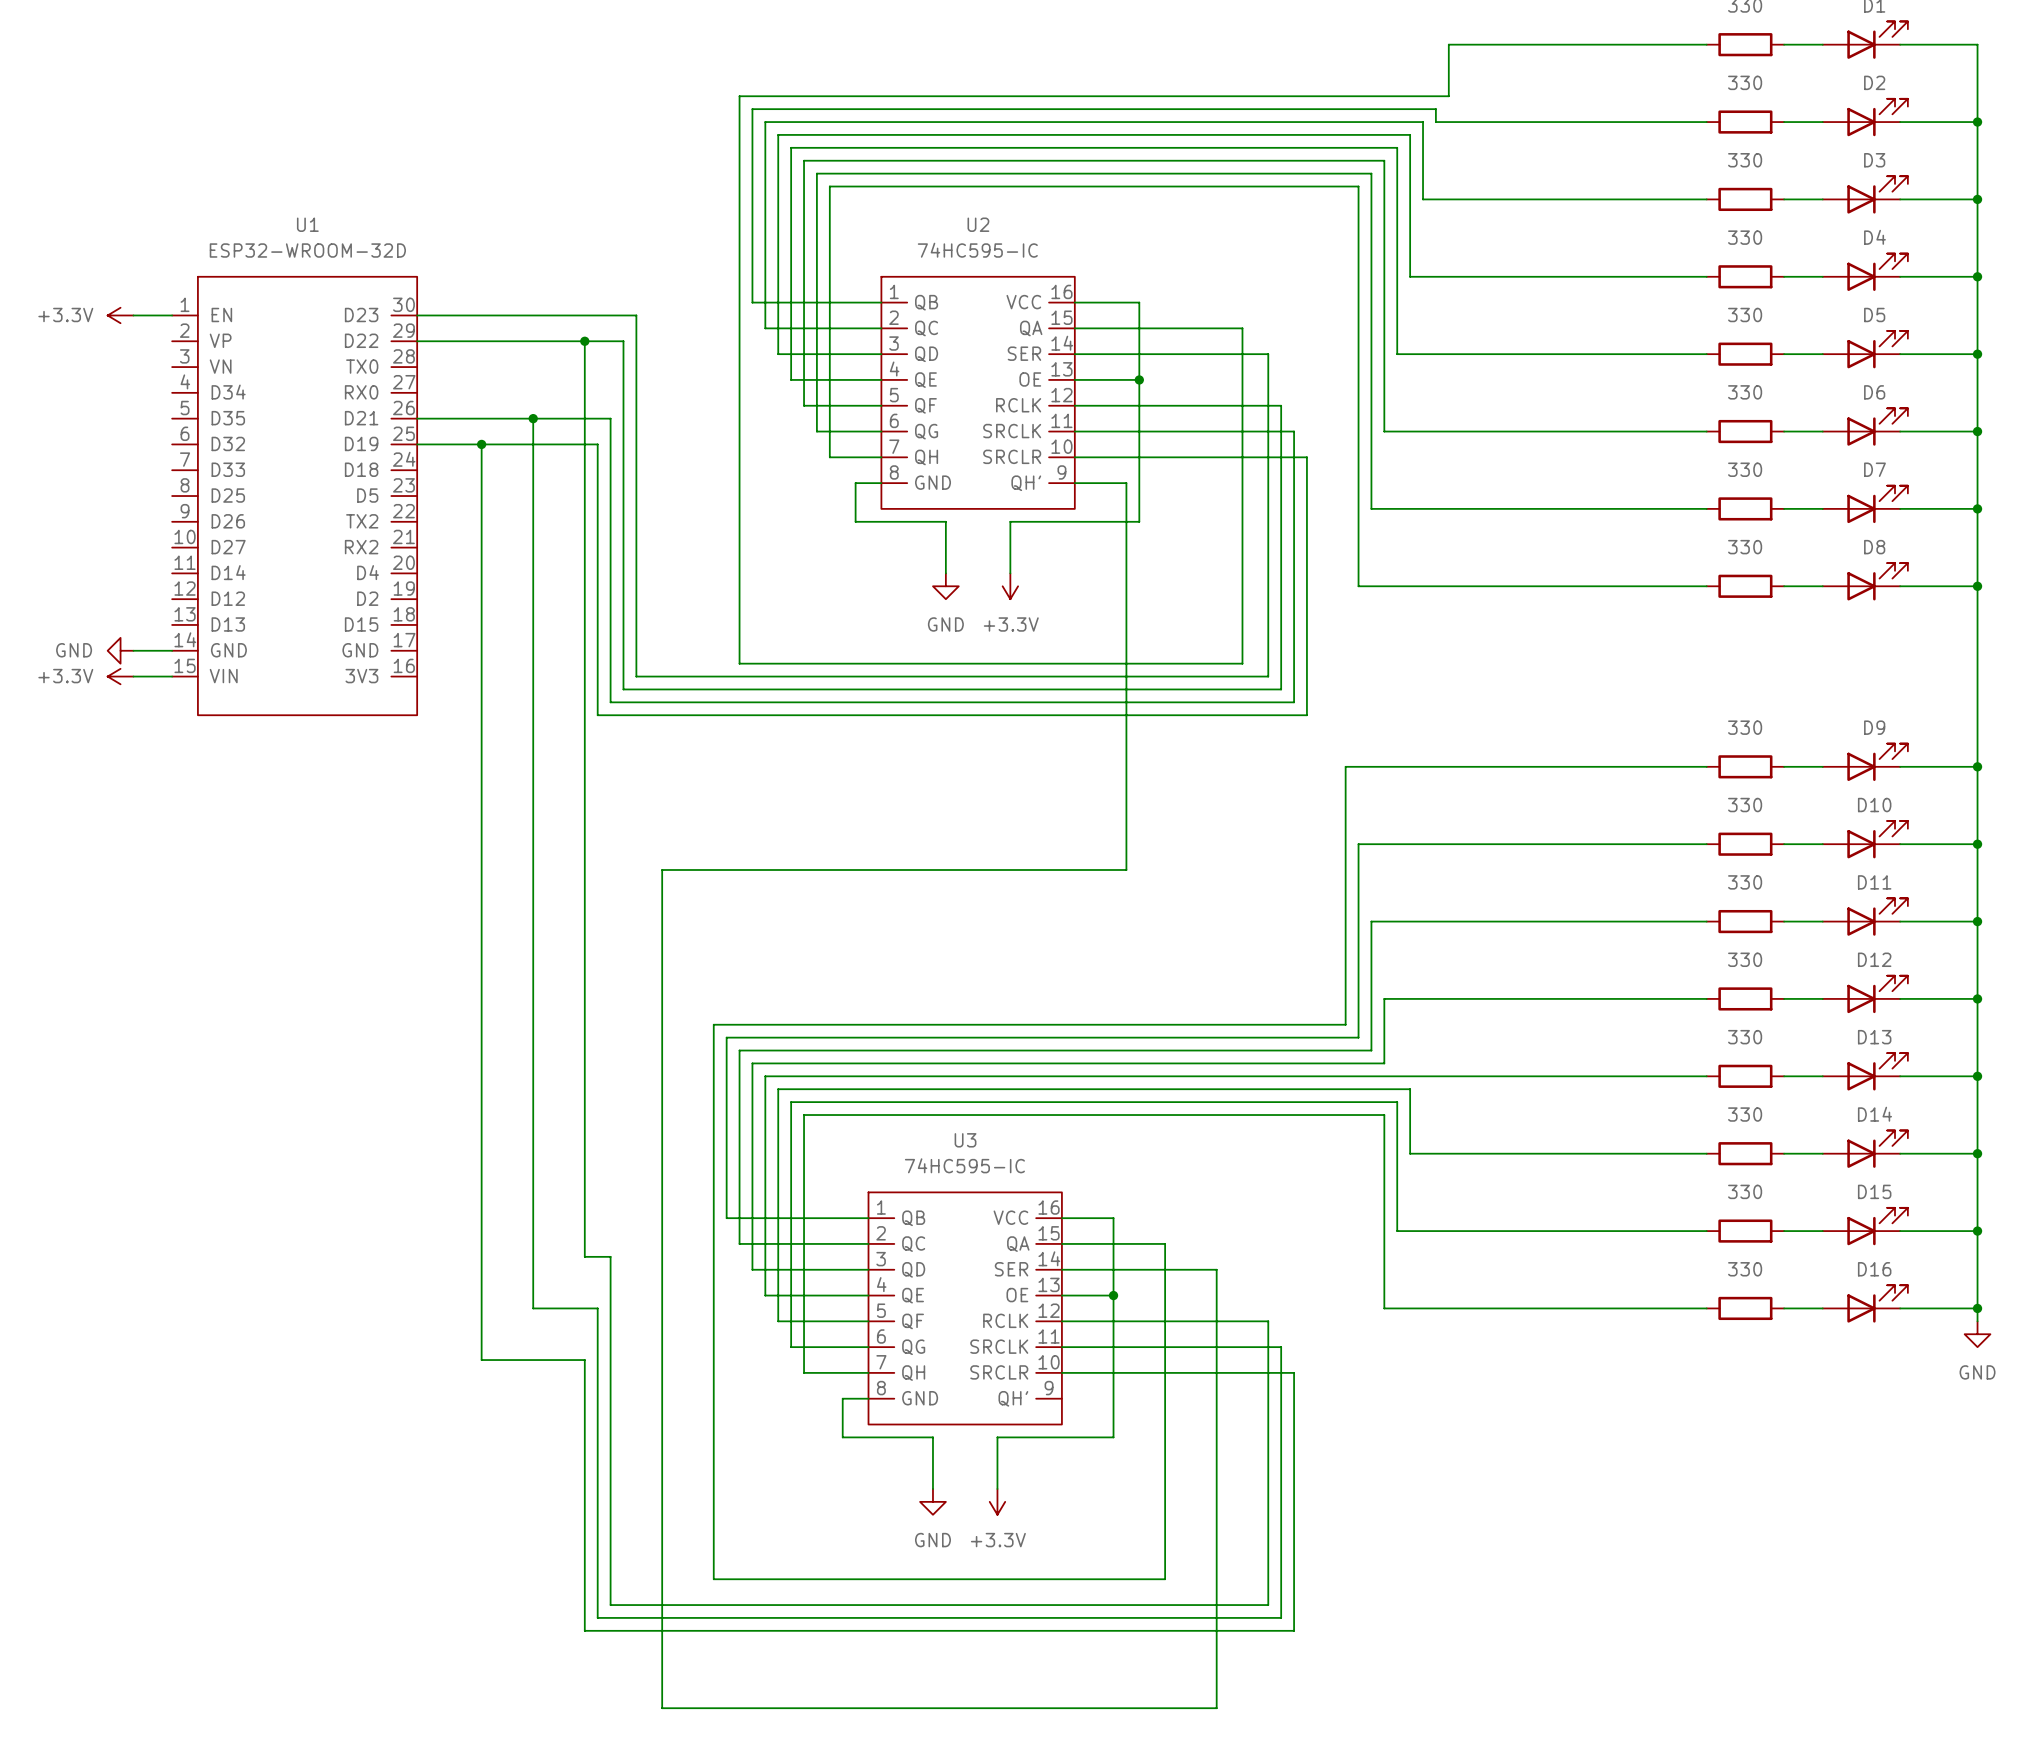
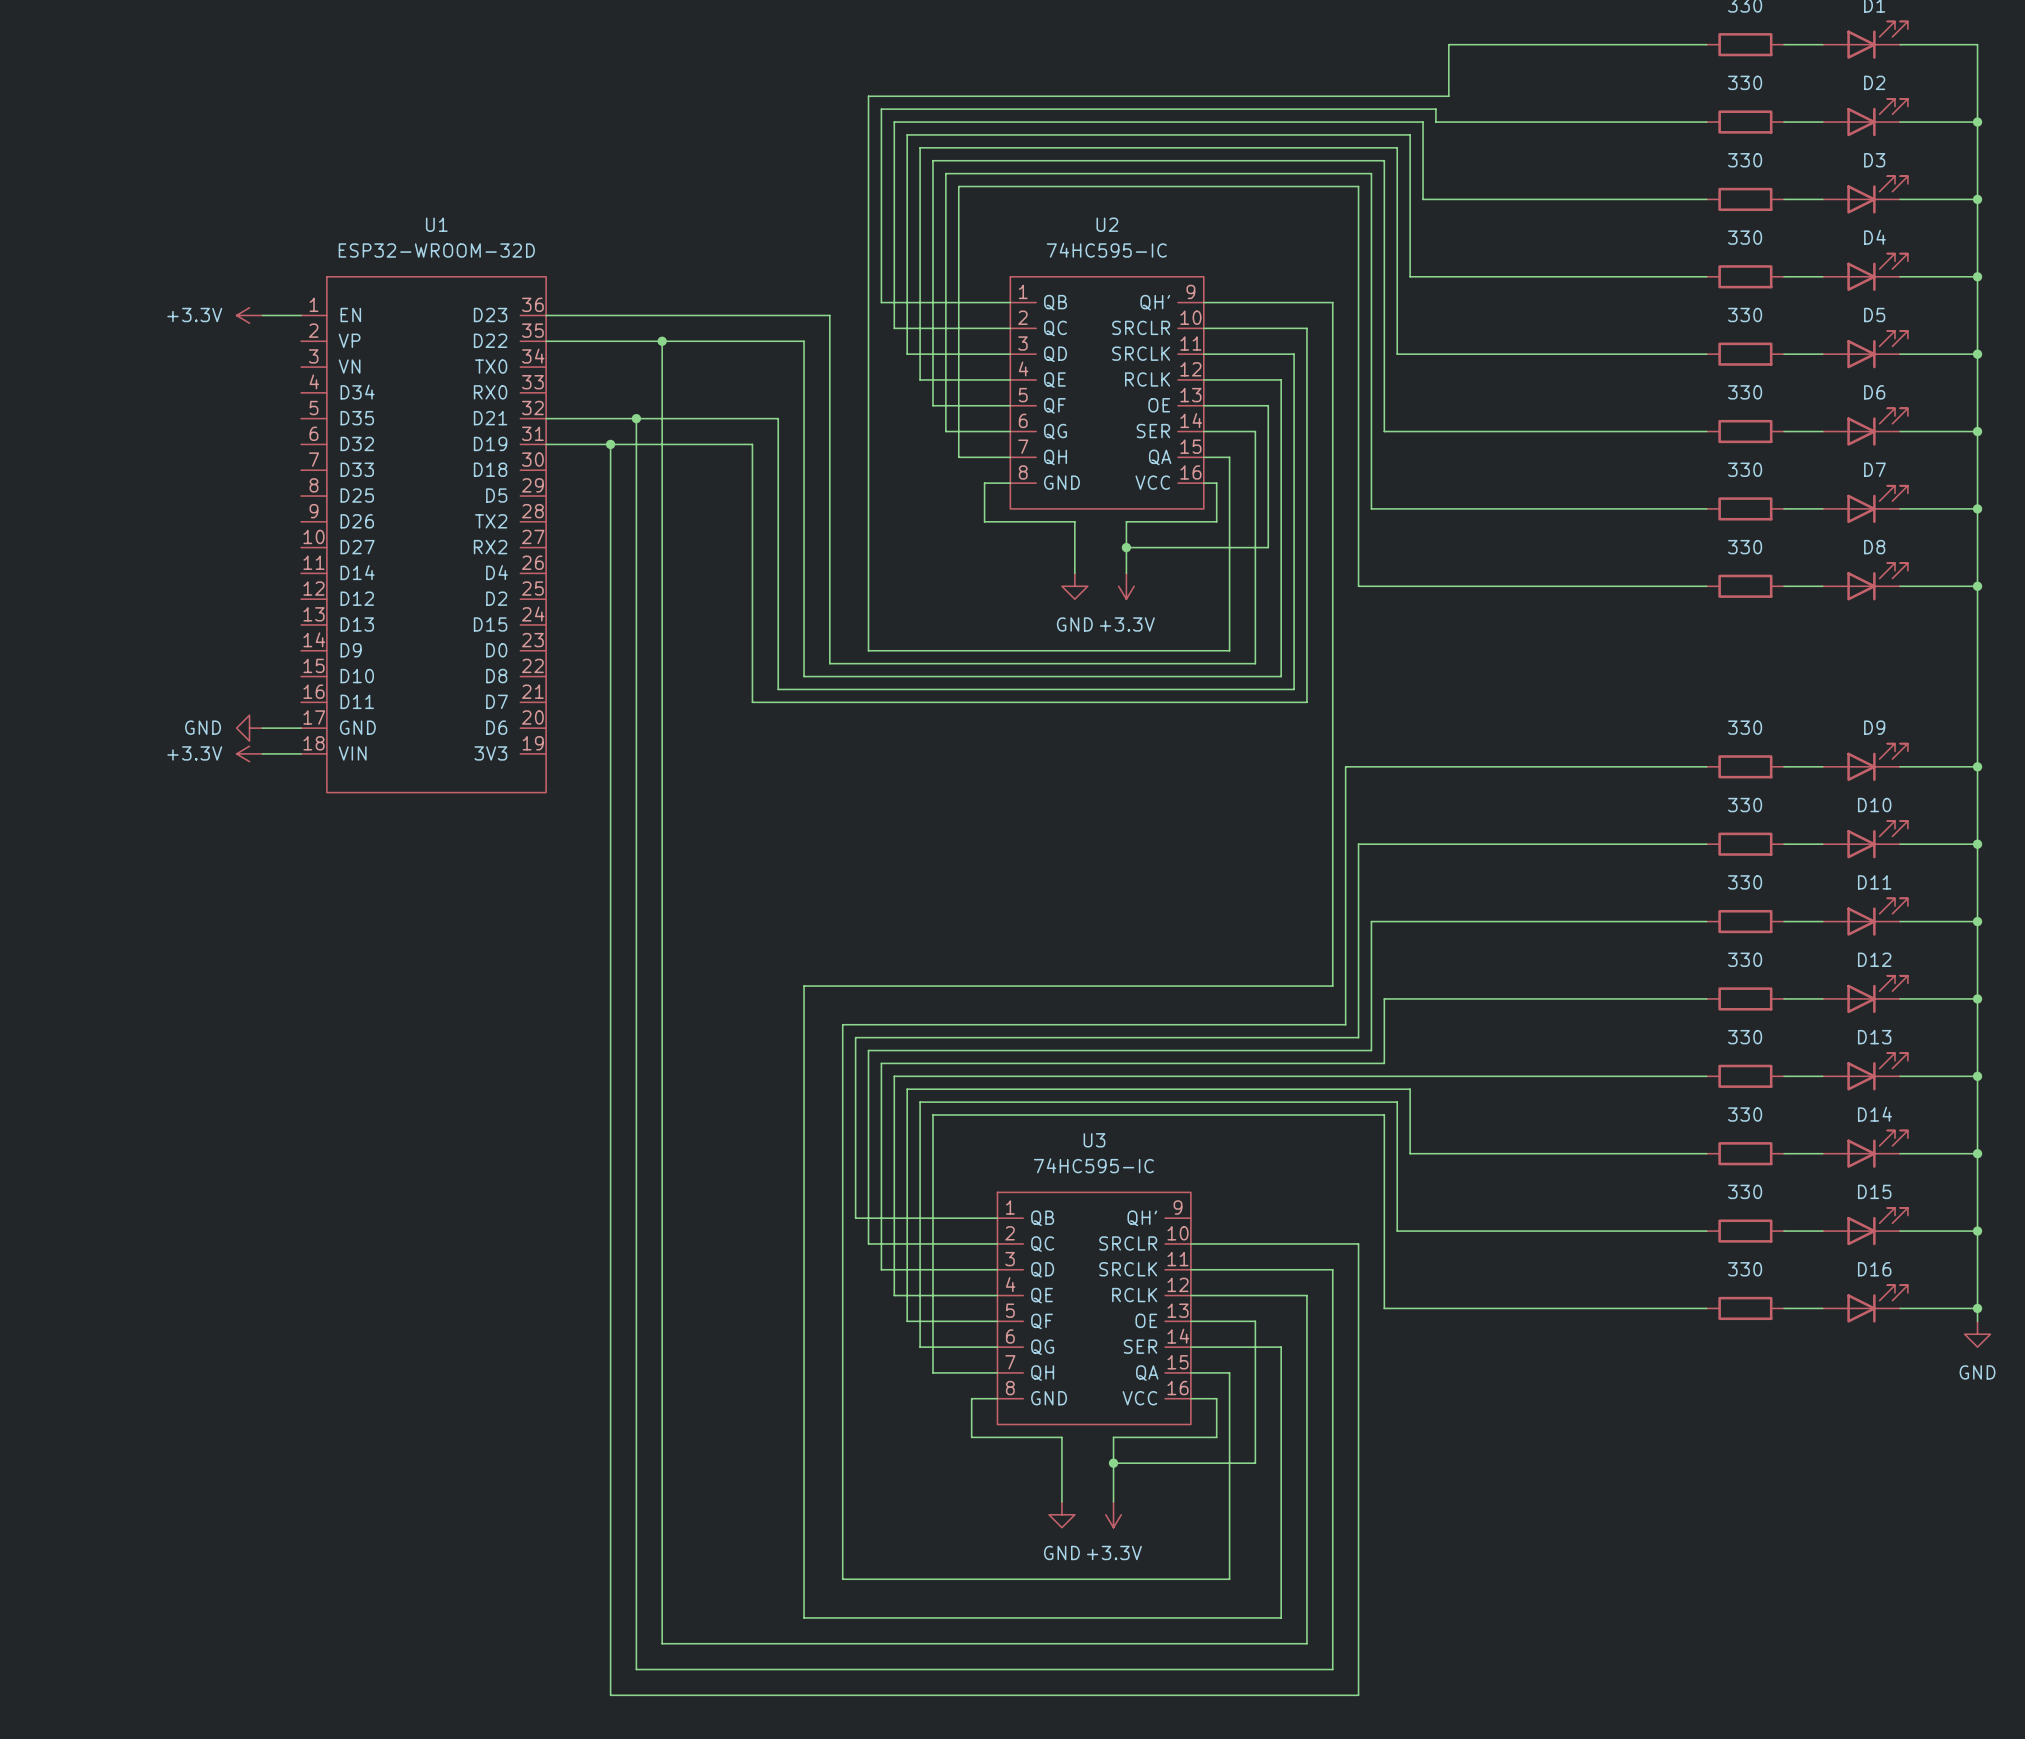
wire: (868, 96) (739, 96) (739, 663) (829, 663) -> (868, 96) (868, 650) (1229, 650) (1229, 457)
wire: (881, 109) (752, 109) (752, 302) (881, 302) -> (881, 109) (881, 302) (1010, 302)
wire: (894, 122) (765, 122) (765, 328) (881, 328) -> (894, 122) (894, 328) (1010, 328)
wire: (907, 134) (778, 134) (778, 354) (881, 354) -> (907, 134) (907, 354) (1010, 354)
wire: (920, 147) (791, 147) (791, 379) (881, 379) -> (920, 147) (920, 379) (1010, 379)
wire: (932, 160) (804, 160) (804, 341) -> (932, 160) (932, 405) (1010, 405)
wire: (945, 173) (816, 173) (816, 431) (881, 431) -> (945, 173) (945, 431) (1010, 431)
wire: (958, 186) (829, 186) (829, 315) -> (958, 186) (958, 457) (1010, 457)
U1 name position: U1 (307, 224) -> U1 (436, 224)
U1 value position: ESP32-WROOM-32D (307, 250) -> ESP32-WROOM-32D (436, 250)
U1 symbol: [172, 276, 418, 716] -> [301, 276, 547, 793]
U2 symbol: [881, 276, 1075, 509] -> [1010, 276, 1204, 509]
wire: (1074, 302) (1139, 302) (1139, 521) -> (1203, 483) (1216, 483) (1216, 521) (1139, 521)
wire: none -> (1203, 302) (1332, 302) (1332, 986) (804, 986) (804, 1115)
power symbol position: +3.3V (120, 315) -> +3.3V (249, 315)
wire: (133, 315) (172, 315) -> (262, 315) (301, 315)
wire: (417, 315) (546, 315) -> none
wire: (636, 315) (636, 418) -> (636, 315) (829, 315)
wire: (1074, 328) (1203, 328) -> none
wire: (1242, 328) (1242, 663) -> (1255, 431) (1255, 663) (1242, 663)
wire: (417, 341) (546, 341) -> none
wire: (584, 341) (584, 1256) (610, 1256) -> (610, 702) (610, 1256)
junction: (584, 341) -> none
wire: (623, 341) (623, 689) (778, 689) -> (610, 418) (778, 418) (778, 689)
wire: none -> (623, 341) (804, 341)
junction: none -> (662, 341)
wire: (1074, 354) (1203, 354) -> none
wire: (1268, 354) (1268, 405) (1281, 405) -> (1268, 354) (1294, 354) (1294, 431)
wire: (1074, 379) (1139, 379) -> none
junction: (1139, 379) -> none
wire: none -> (1203, 379) (1281, 379) (1281, 405)
wire: (804, 405) (881, 405) -> (804, 405) (804, 676)
wire: (1074, 405) (1203, 405) -> none
wire: (417, 418) (546, 418) -> none
wire: (533, 418) (533, 1308) (597, 1308) (597, 1617) (804, 1617) -> none
junction: (533, 418) -> none
wire: (610, 418) (610, 444) -> none
junction: none -> (636, 418)
wire: (1074, 431) (1203, 431) -> none
wire: (1255, 431) (1294, 431) -> none
wire: (417, 444) (546, 444) -> none
wire: (481, 444) (481, 1360) (584, 1360) (584, 1630) (1294, 1630) (1294, 1372) (1229, 1372) -> none
junction: (481, 444) -> none
wire: (597, 444) (597, 715) (1306, 715) (1306, 702) -> none
junction: none -> (610, 444)
wire: (829, 457) (881, 457) -> (829, 457) (829, 663)
wire: (1074, 457) (1203, 457) -> none
wire: (1229, 457) (1306, 457) -> (1242, 328) (1306, 328) (1306, 457)
wire: (881, 483) (855, 483) (855, 521) (945, 521) (945, 573) -> none
wire: (1074, 483) (1126, 483) (1126, 521) (1074, 521) -> (1074, 573) (1074, 521)
wire: (1010, 521) (1010, 573) -> (1010, 521) (984, 521) (984, 483) (1010, 483)
junction: none -> (1126, 547)
wire: (1268, 547) (1268, 676) -> (1268, 547) (1126, 547)
wire: (1126, 573) (1126, 869) (662, 869) -> (662, 341) (662, 869)
power symbol position: GND (945, 586) -> GND (1074, 586)
power symbol position: +3.3V (1010, 586) -> +3.3V (1126, 586)
power symbol position: GND (120, 650) -> GND (249, 728)
wire: (133, 650) (172, 650) -> (262, 728) (301, 728)
power symbol position: +3.3V (120, 676) -> +3.3V (249, 753)
wire: (133, 676) (172, 676) -> (262, 753) (301, 753)
wire: (636, 676) (804, 676) -> (636, 676) (636, 1669) (1332, 1669) (1332, 1269) (1216, 1269)
wire: (1281, 676) (1281, 689) -> (1281, 676) (1268, 676)
wire: none -> (1281, 689) (1294, 689)
wire: (1294, 689) (1294, 702) -> (1306, 702) (1294, 702)
wire: (610, 702) (752, 702) -> (597, 444) (752, 444) (752, 702)
wire: (842, 1024) (713, 1024) (713, 1579) (842, 1579) -> (842, 1024) (842, 1398)
wire: (855, 1037) (726, 1037) (726, 1218) (855, 1218) -> (855, 1037) (855, 1218)
wire: (868, 1050) (739, 1050) (739, 1243) (868, 1243) -> (868, 1050) (868, 1243) (997, 1243)
wire: (881, 1063) (752, 1063) (752, 1269) (868, 1269) -> (881, 1063) (881, 1269) (997, 1269)
wire: (894, 1076) (765, 1076) (765, 1295) (868, 1295) -> (894, 1076) (894, 1295) (997, 1295)
wire: (907, 1089) (778, 1089) (778, 1321) (868, 1321) -> (907, 1089) (907, 1321) (997, 1321)
wire: (920, 1102) (791, 1102) (791, 1347) (868, 1347) -> (920, 1102) (920, 1347) (997, 1347)
wire: (804, 1115) (932, 1115) -> (997, 1372) (932, 1372) (932, 1115)
U3 symbol: [868, 1192, 1062, 1425] -> [997, 1192, 1191, 1425]
wire: (1061, 1218) (1113, 1218) (1113, 1437) (1061, 1437) -> (1061, 1501) (1061, 1437)
wire: (1061, 1243) (1165, 1243) (1165, 1579) -> (1229, 1372) (1229, 1579) (1165, 1579)
wire: (1061, 1269) (1190, 1269) -> (868, 1218) (997, 1218)
wire: (1216, 1269) (1216, 1398) -> (1190, 1398) (1216, 1398)
wire: (1061, 1295) (1113, 1295) -> none
junction: (1113, 1295) -> none
wire: (1061, 1321) (1190, 1321) -> none
wire: (1255, 1321) (1268, 1321) (1268, 1605) (610, 1605) -> (1190, 1243) (1358, 1243) (1358, 1695) (610, 1695) (610, 1605)
wire: none -> (1255, 1321) (1255, 1463) (1113, 1463)
wire: (1061, 1347) (1190, 1347) -> none
wire: (804, 1372) (868, 1372) -> (804, 1372) (804, 1617)
wire: (1061, 1372) (1190, 1372) -> none
wire: (842, 1398) (868, 1398) -> none
wire: (842, 1437) (932, 1437) (932, 1488) -> (842, 1437) (842, 1579)
wire: (997, 1437) (997, 1488) -> (997, 1437) (971, 1437) (971, 1398) (997, 1398)
wire: (1216, 1437) (1216, 1708) (662, 1708) (662, 1643) -> (1190, 1295) (1306, 1295) (1306, 1643) (662, 1643)
wire: none -> (1216, 1437) (1113, 1437) (1113, 1501)
junction: none -> (1113, 1463)
power symbol position: GND (932, 1501) -> GND (1061, 1514)
power symbol position: +3.3V (997, 1501) -> +3.3V (1113, 1514)

